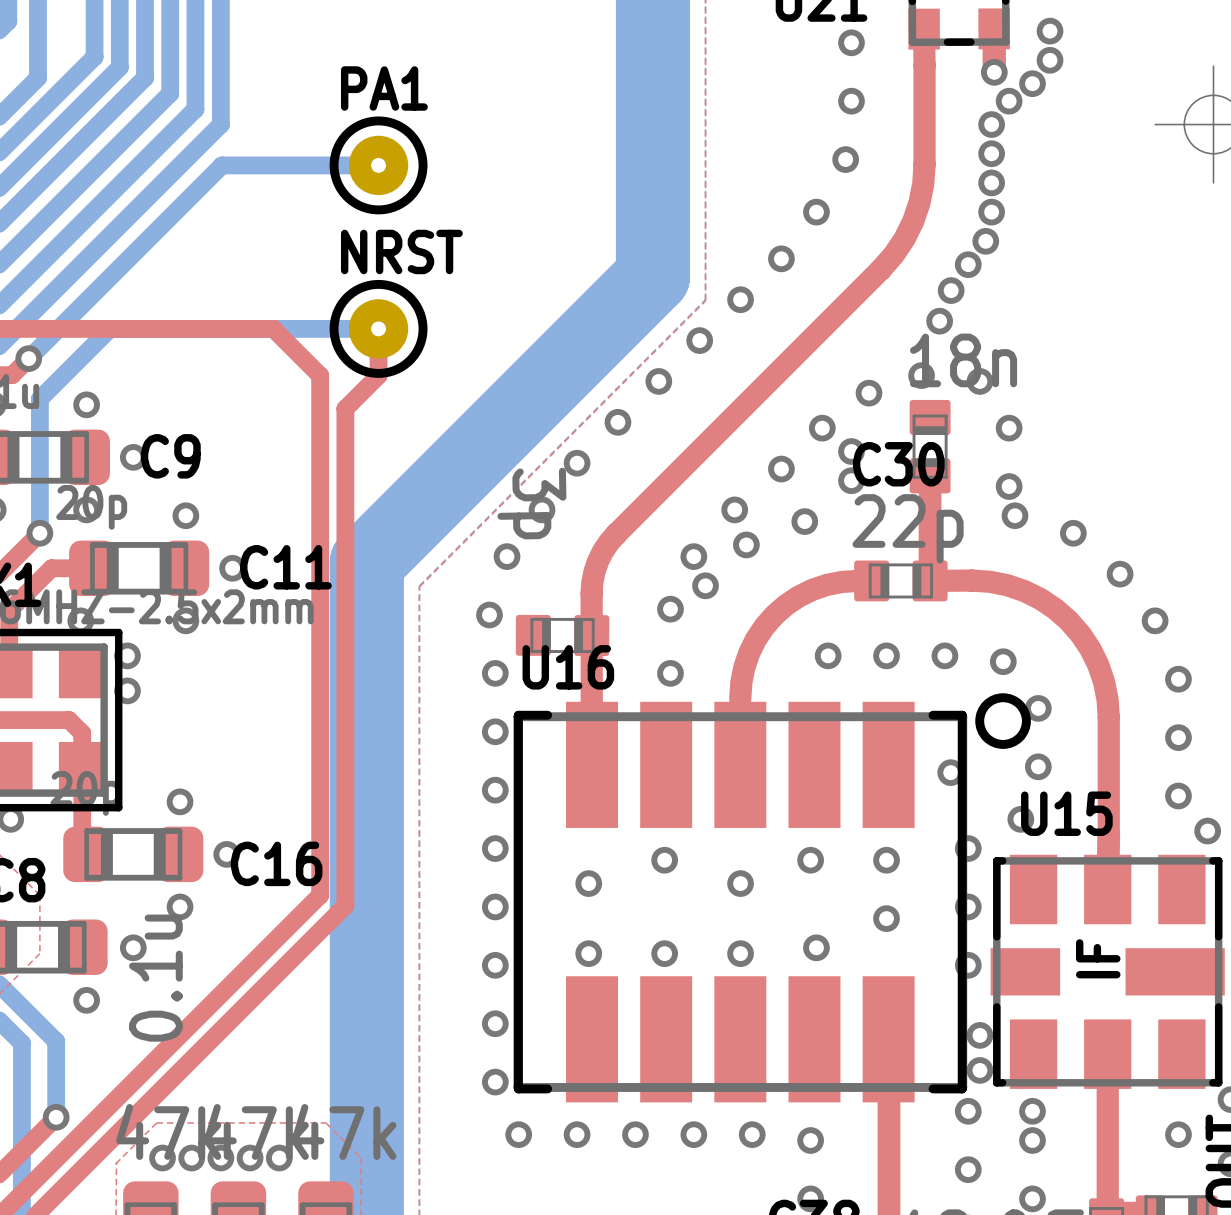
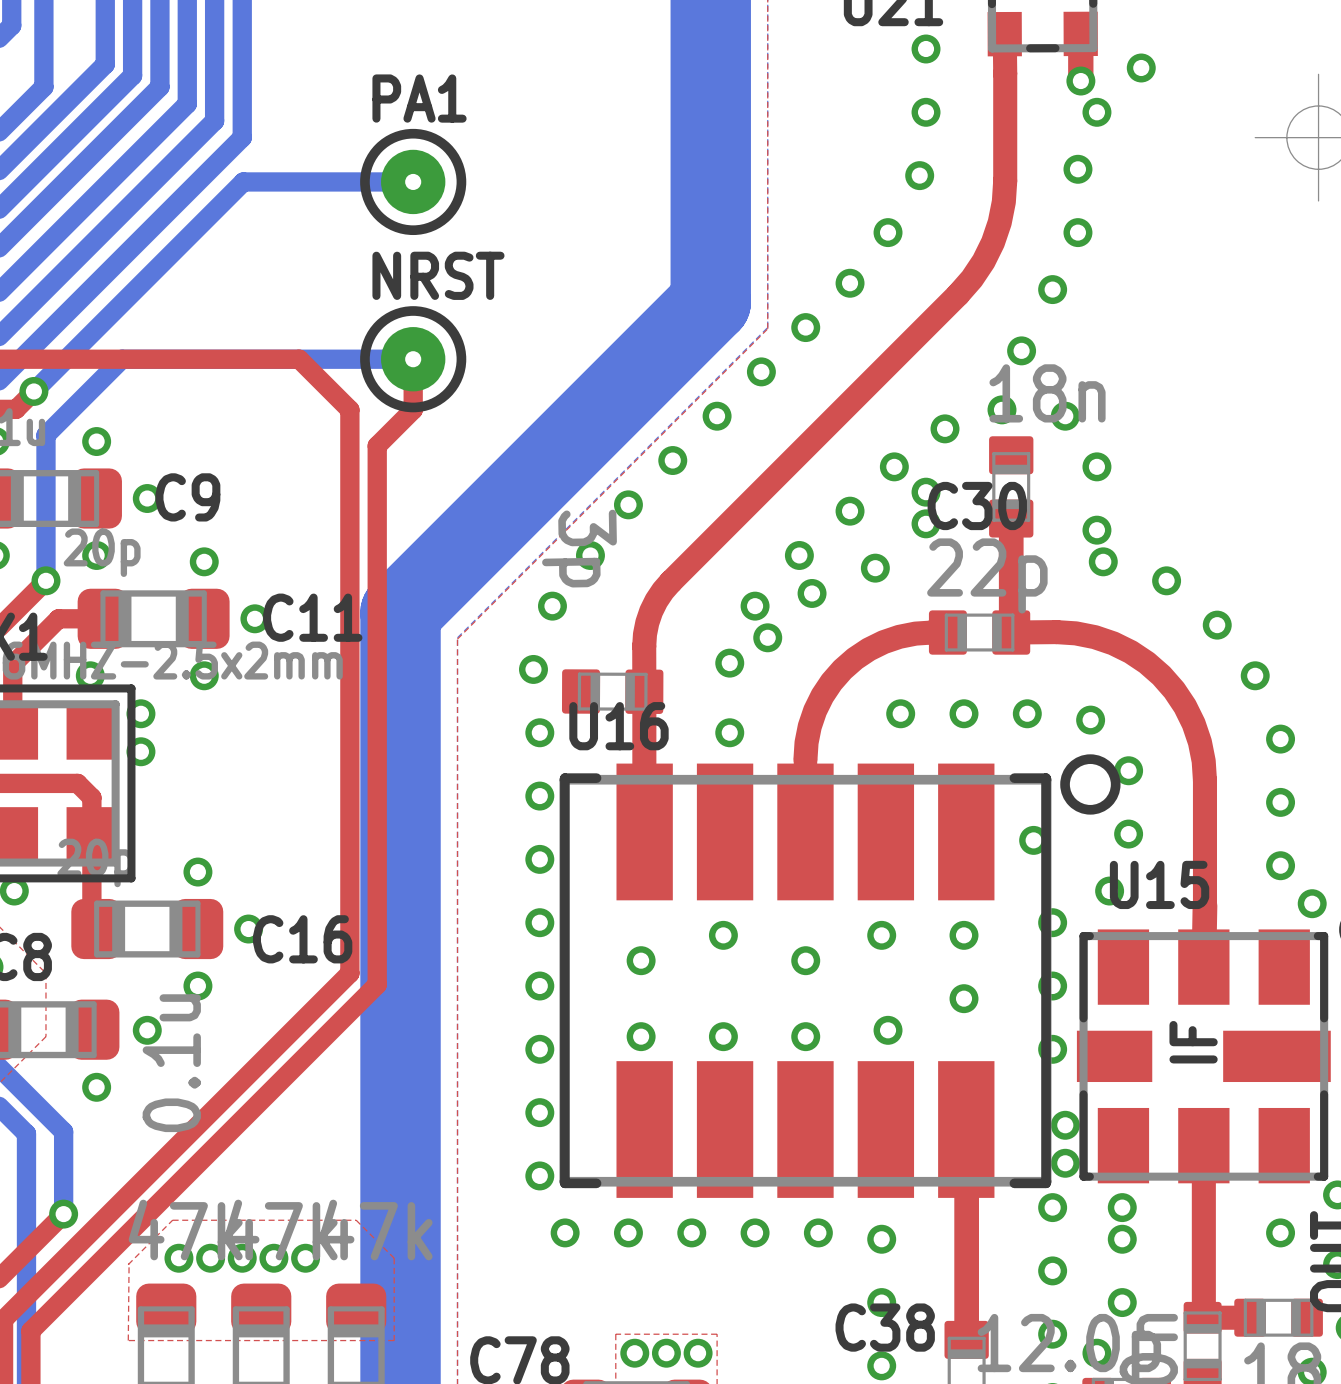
via: (1050, 31) -> none
via: (1032, 83) -> none
via: (991, 124) -> none
via: (991, 182) -> none
via: (985, 241) -> none
via: (951, 290) -> none

